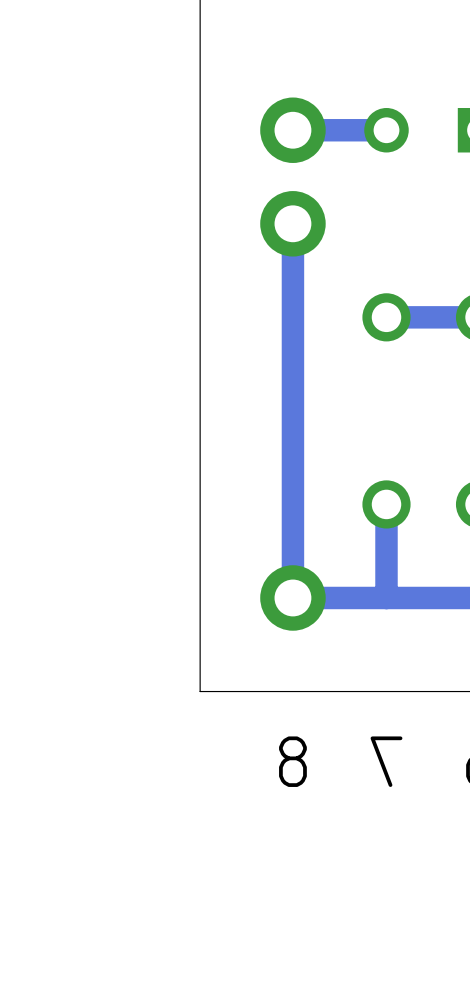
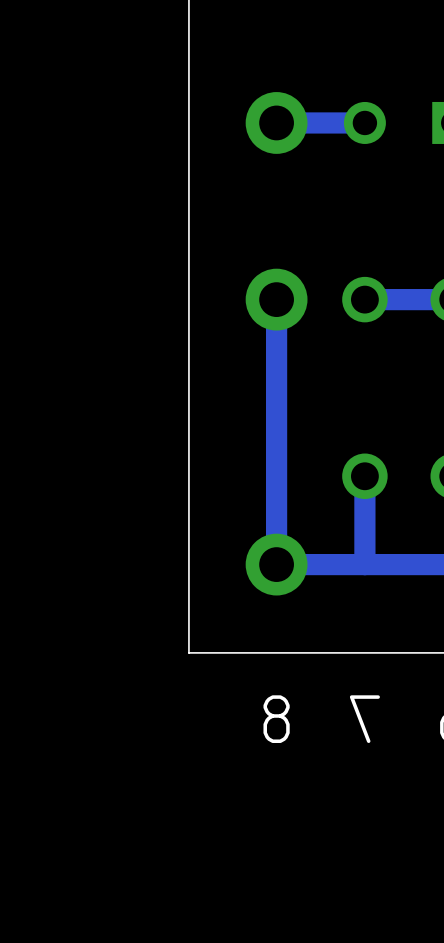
bottom track: (292, 223) (292, 317) -> none
part position: (292, 223) -> (276, 299)

